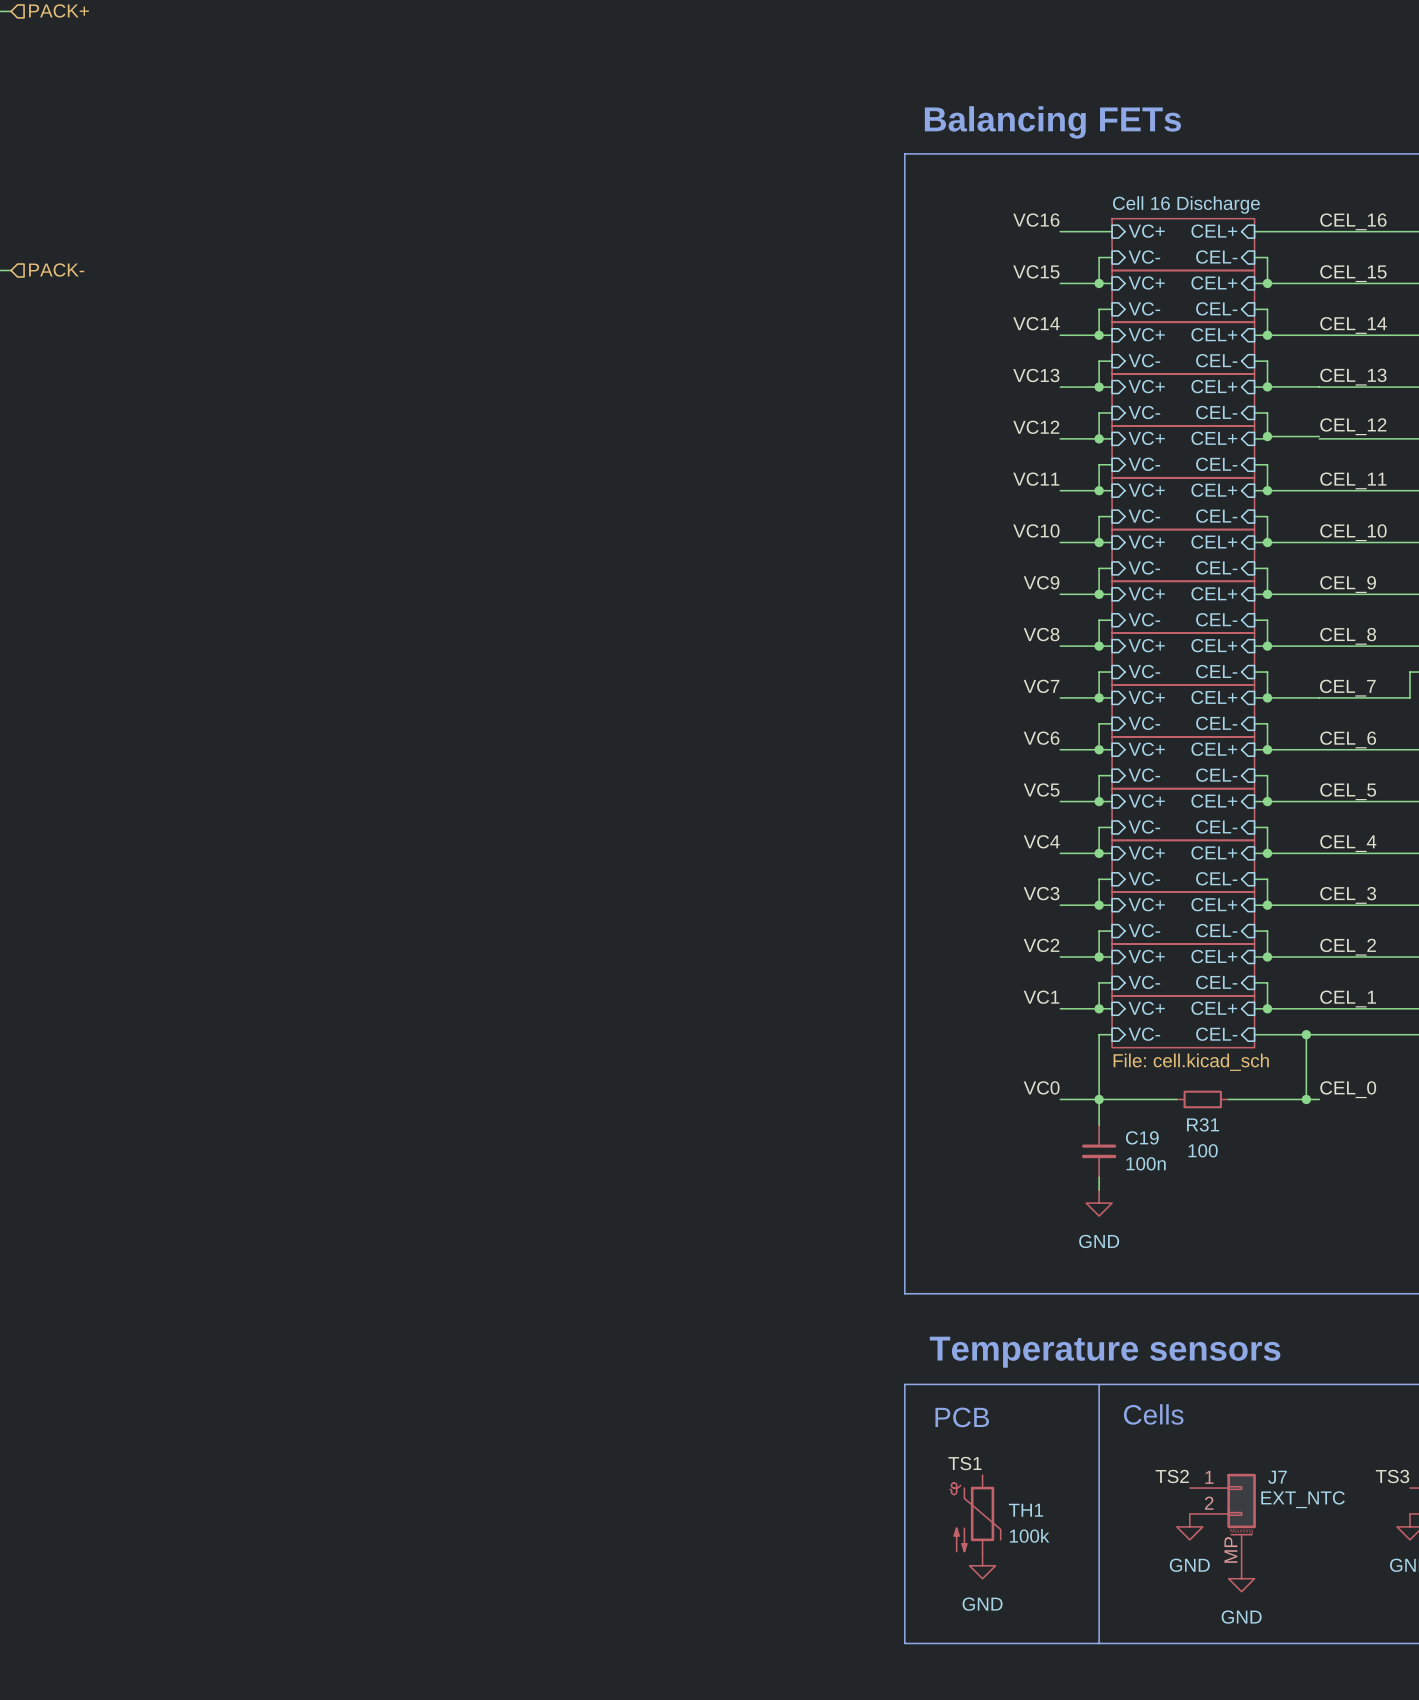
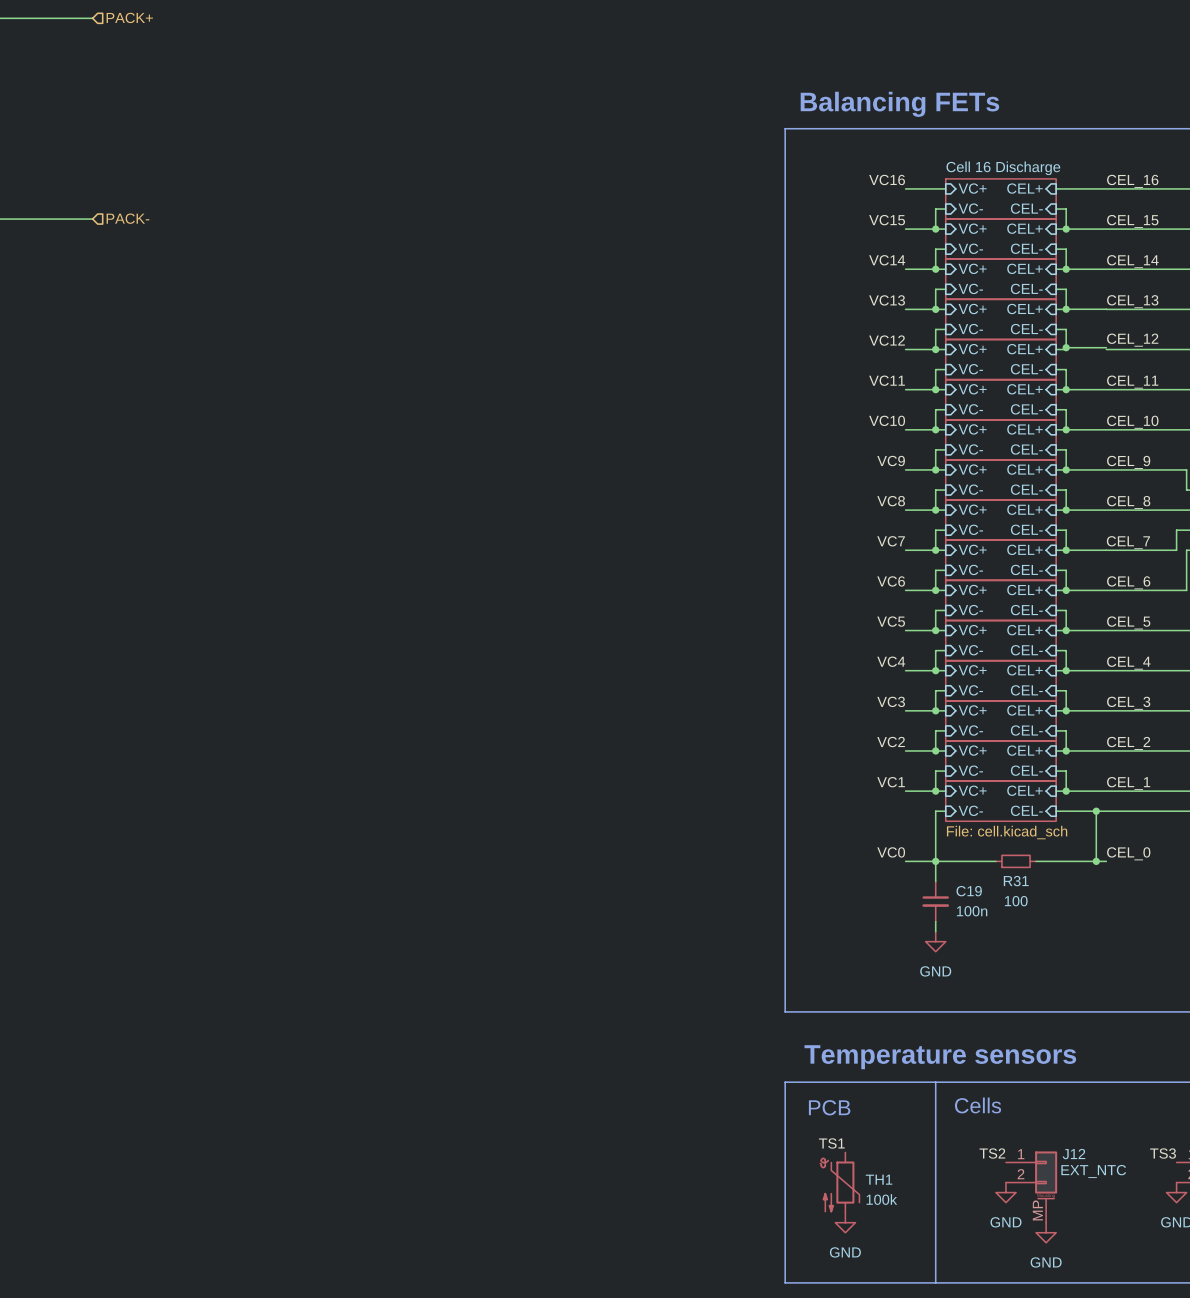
J7 name: J7 (1277, 1477) -> J12 (1073, 1154)

